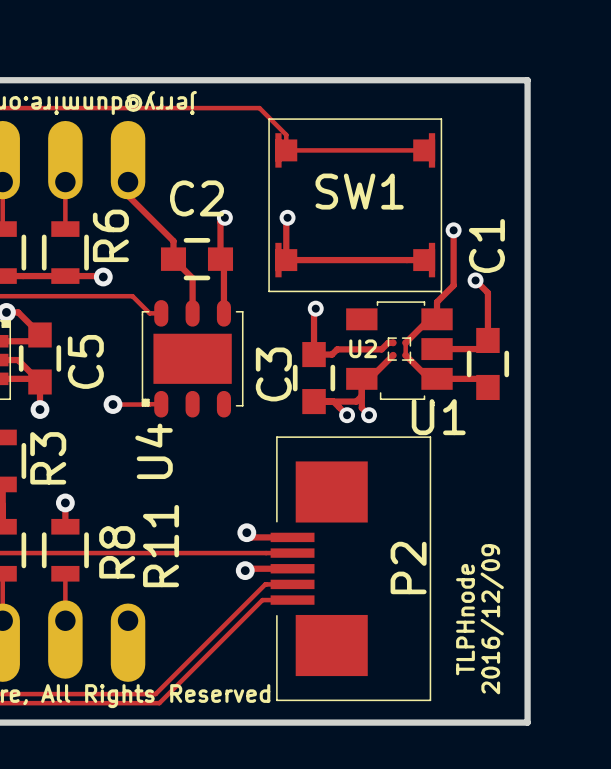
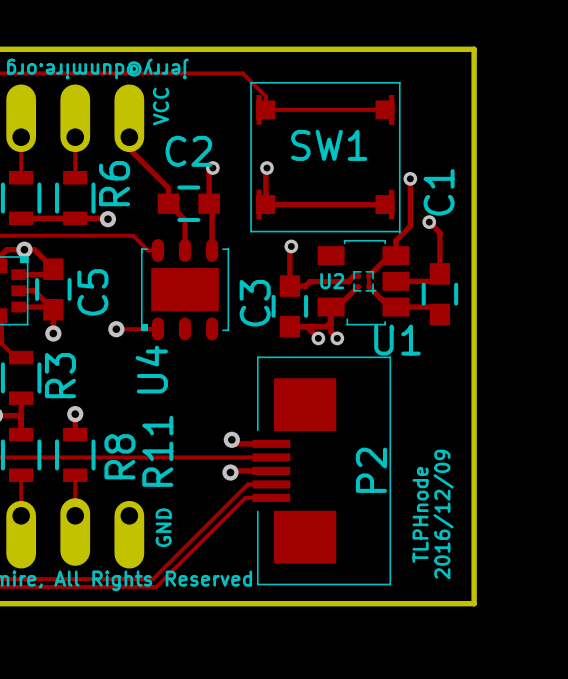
text: none -> VCC (161, 106)
text: none -> GND (163, 527)

